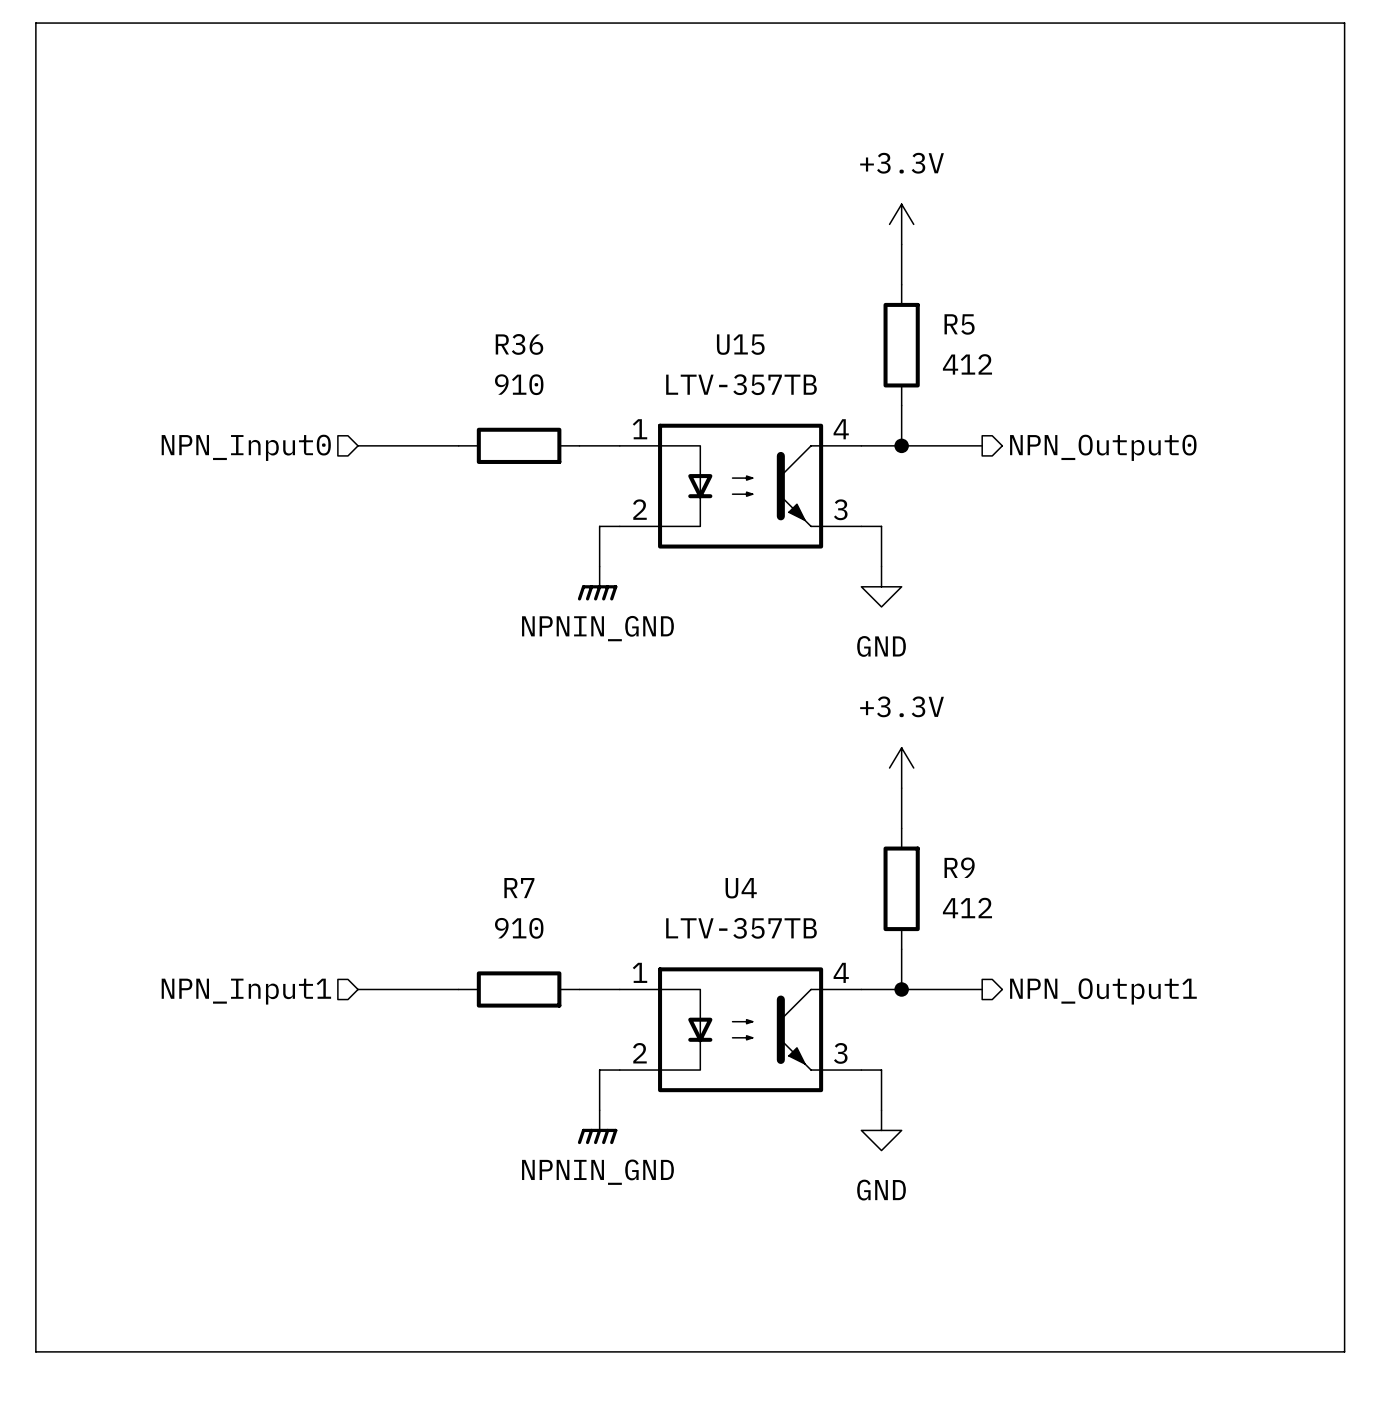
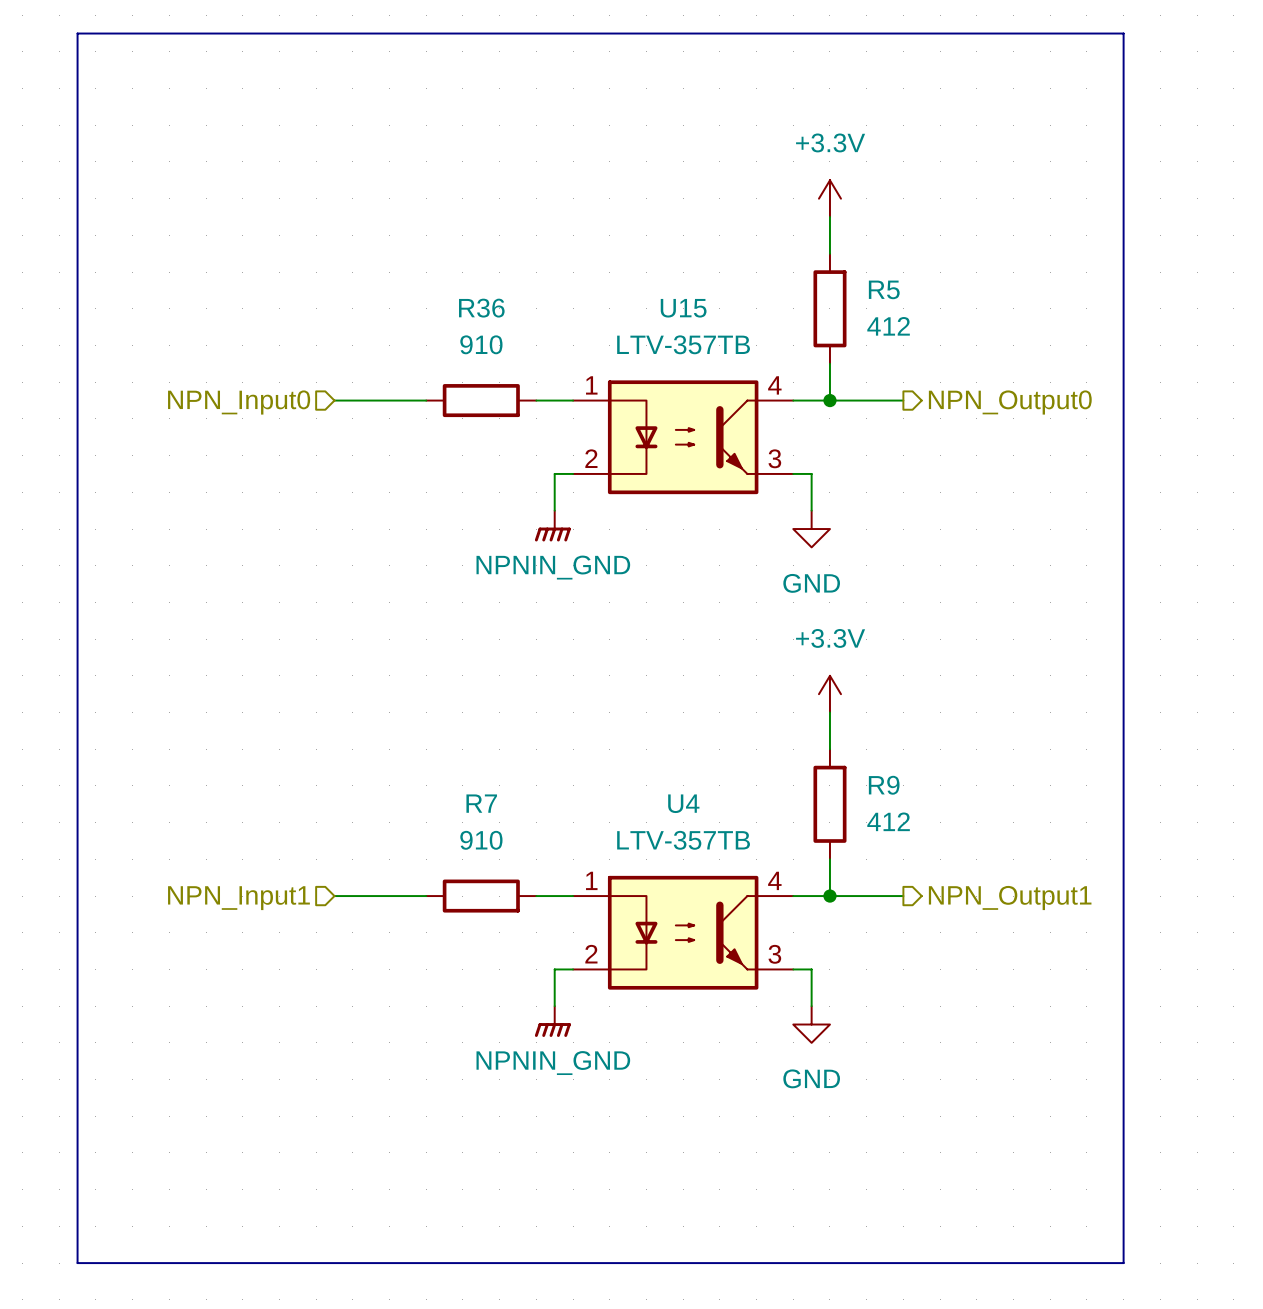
line: (35, 23) (1344, 23) (1344, 1351) (35, 1351) (35, 23) -> (77, 33) (77, 1263) (1123, 1263) (1123, 33) (77, 33)

